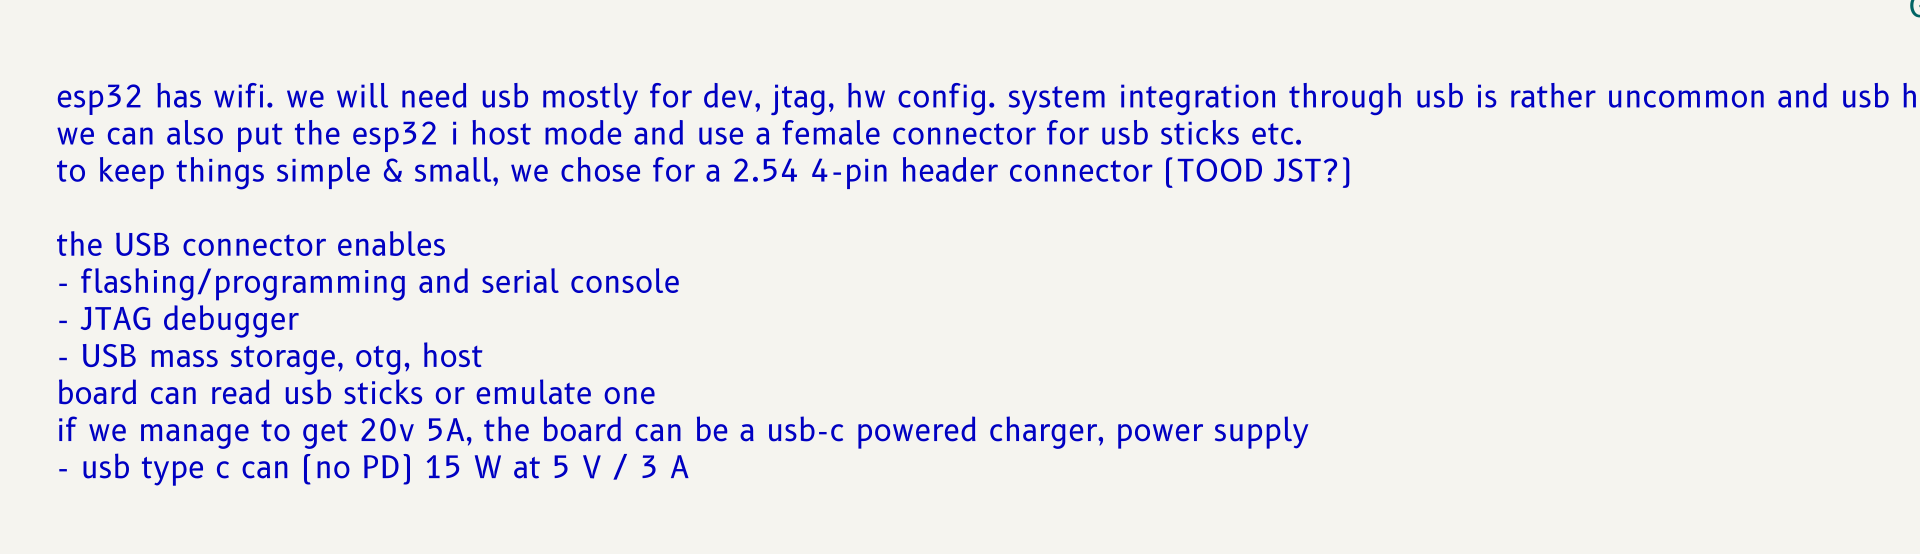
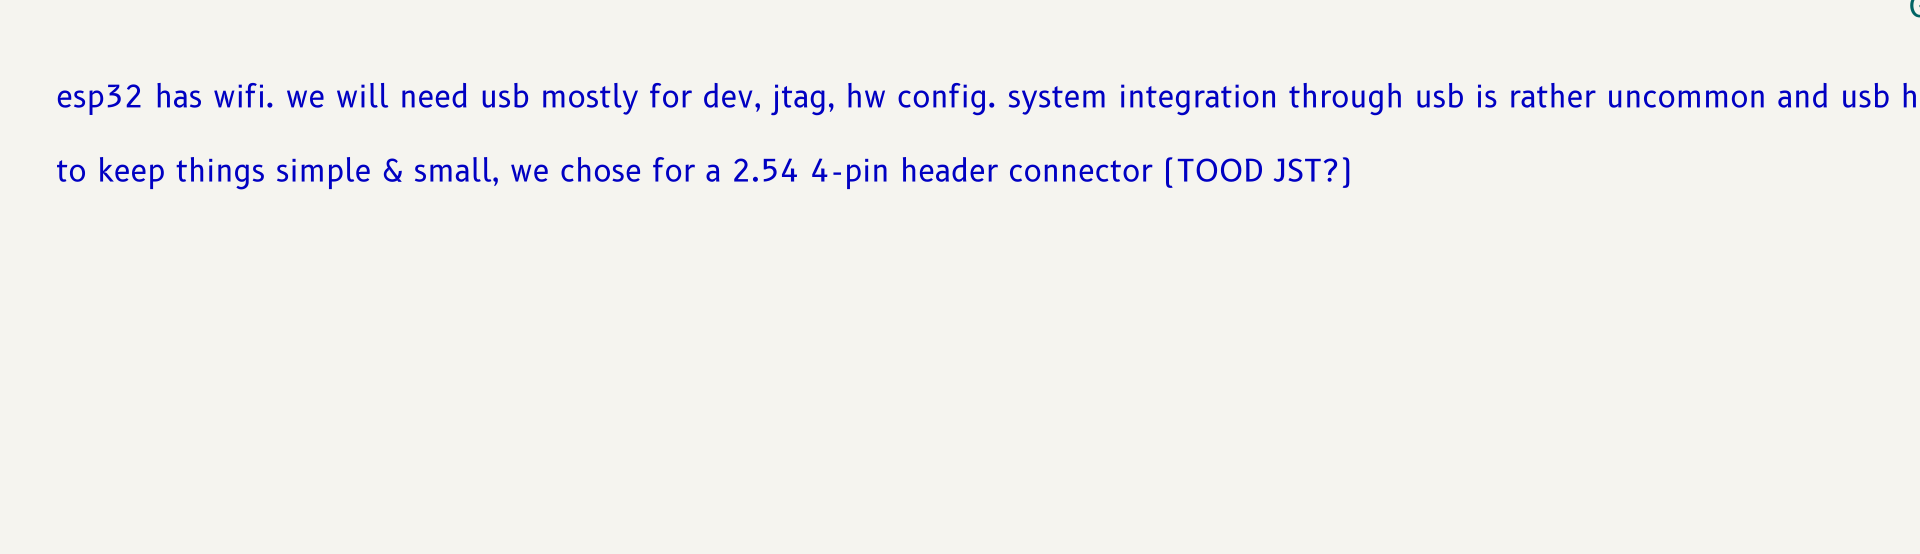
text: we can also put the esp32 i host mode and use a female connector for usb sticks etc. (679, 135) -> none
text: the USB connector enables (250, 243) -> none
text: - flashing/programming and serial console (369, 284) -> none
text: - JTAG debugger (178, 321) -> none
text: - USB mass storage, otg, host (270, 358) -> none
text: board can read usb sticks or emulate one (356, 391) -> none
text: if we manage to get 20v 5A, the board can be a usb-c powered charger, power supply (683, 432) -> none
text: - usb type c can (no PD) 15 W at 5 V / 3 A (373, 469) -> none

